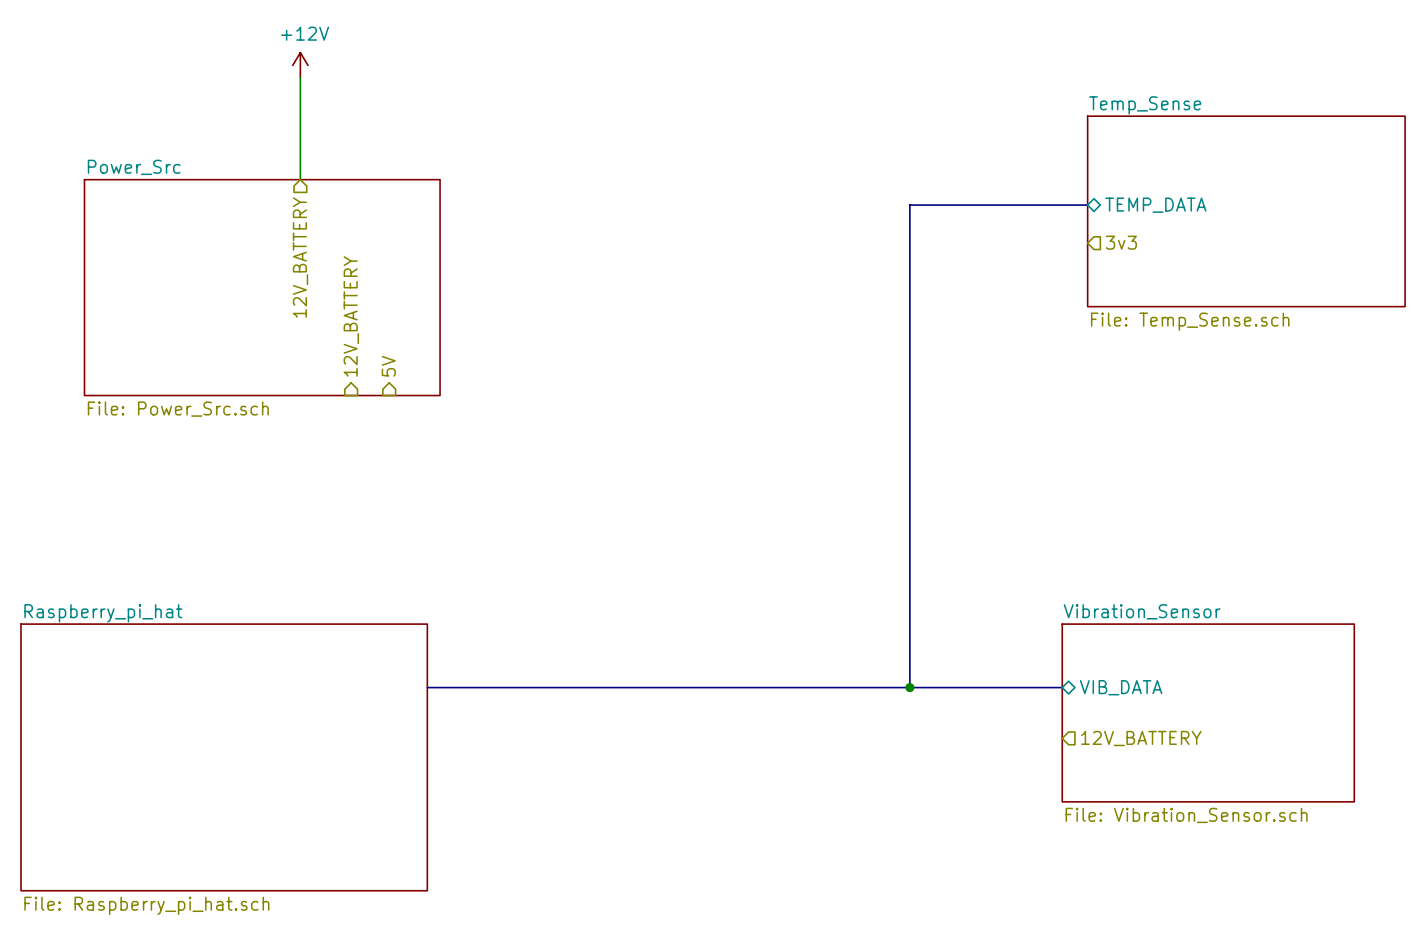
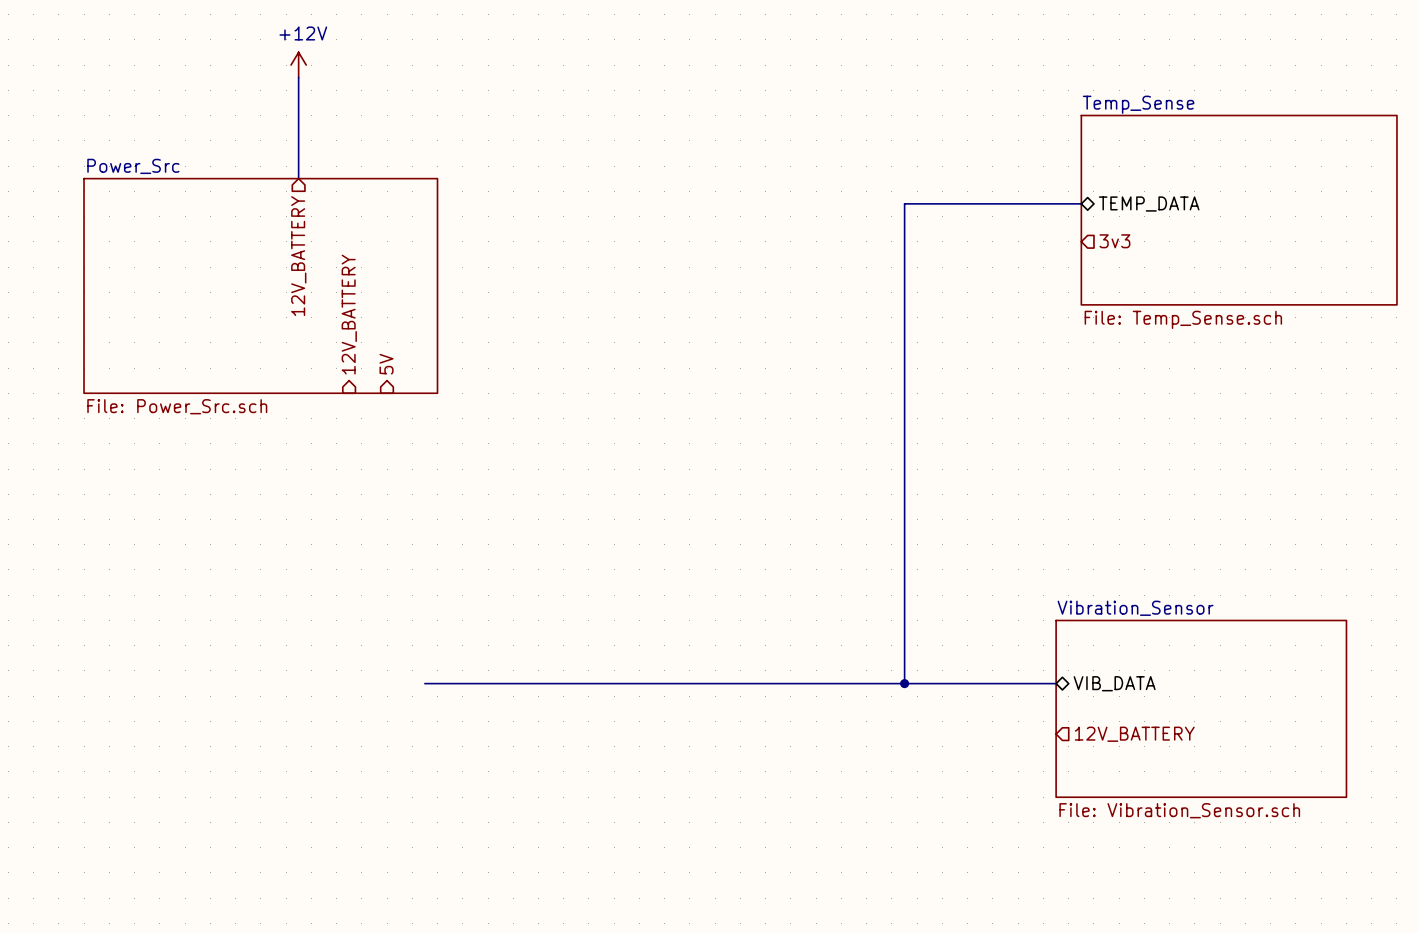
sheet Raspberry_pi_hat: File: Raspberry_pi_hat.sch (224, 757) -> none

